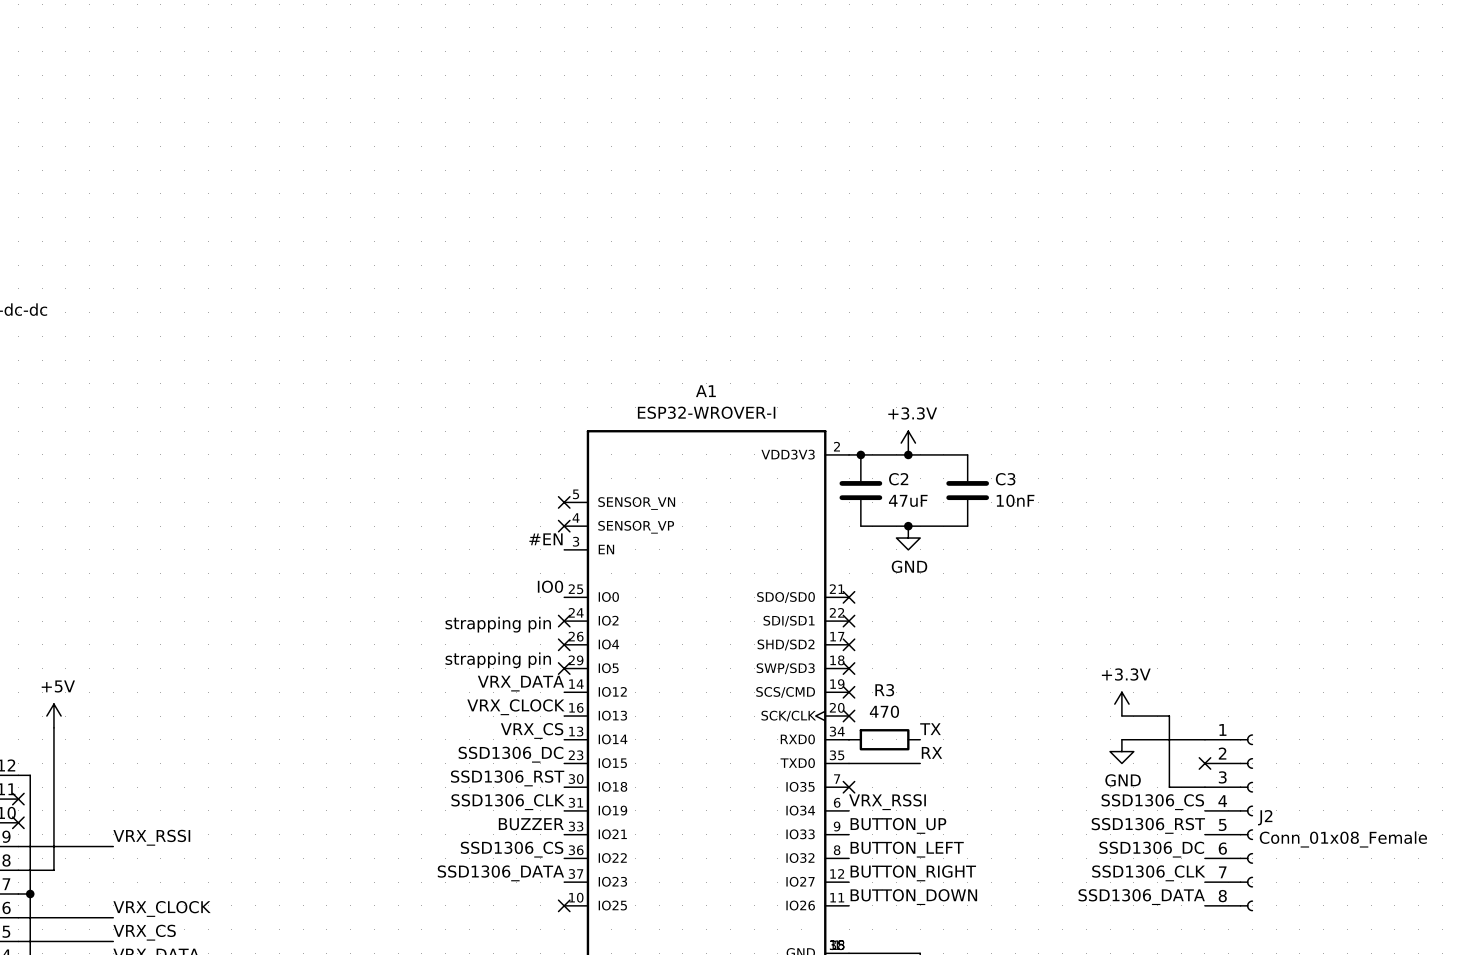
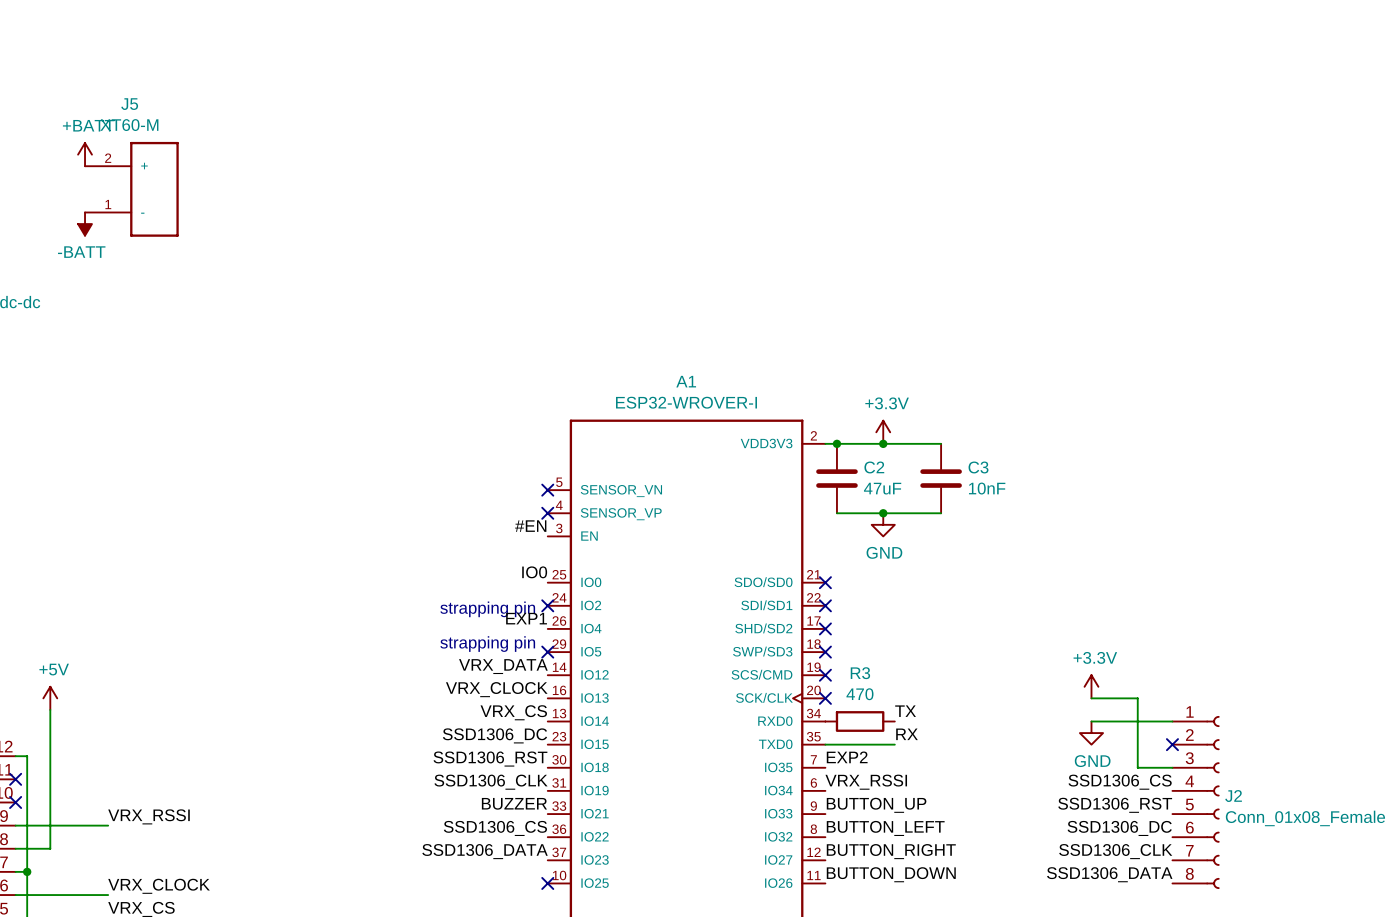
power symbol: none -> +BATT (85, 154)
J5: none -> XT60-M (131, 189)
power symbol: none -> -BATT (85, 224)
label: none -> EXP1 (526, 618)
no-connect mark: (564, 644) -> none
label: none -> EXP2 (847, 757)
no-connect mark: (849, 787) -> none

